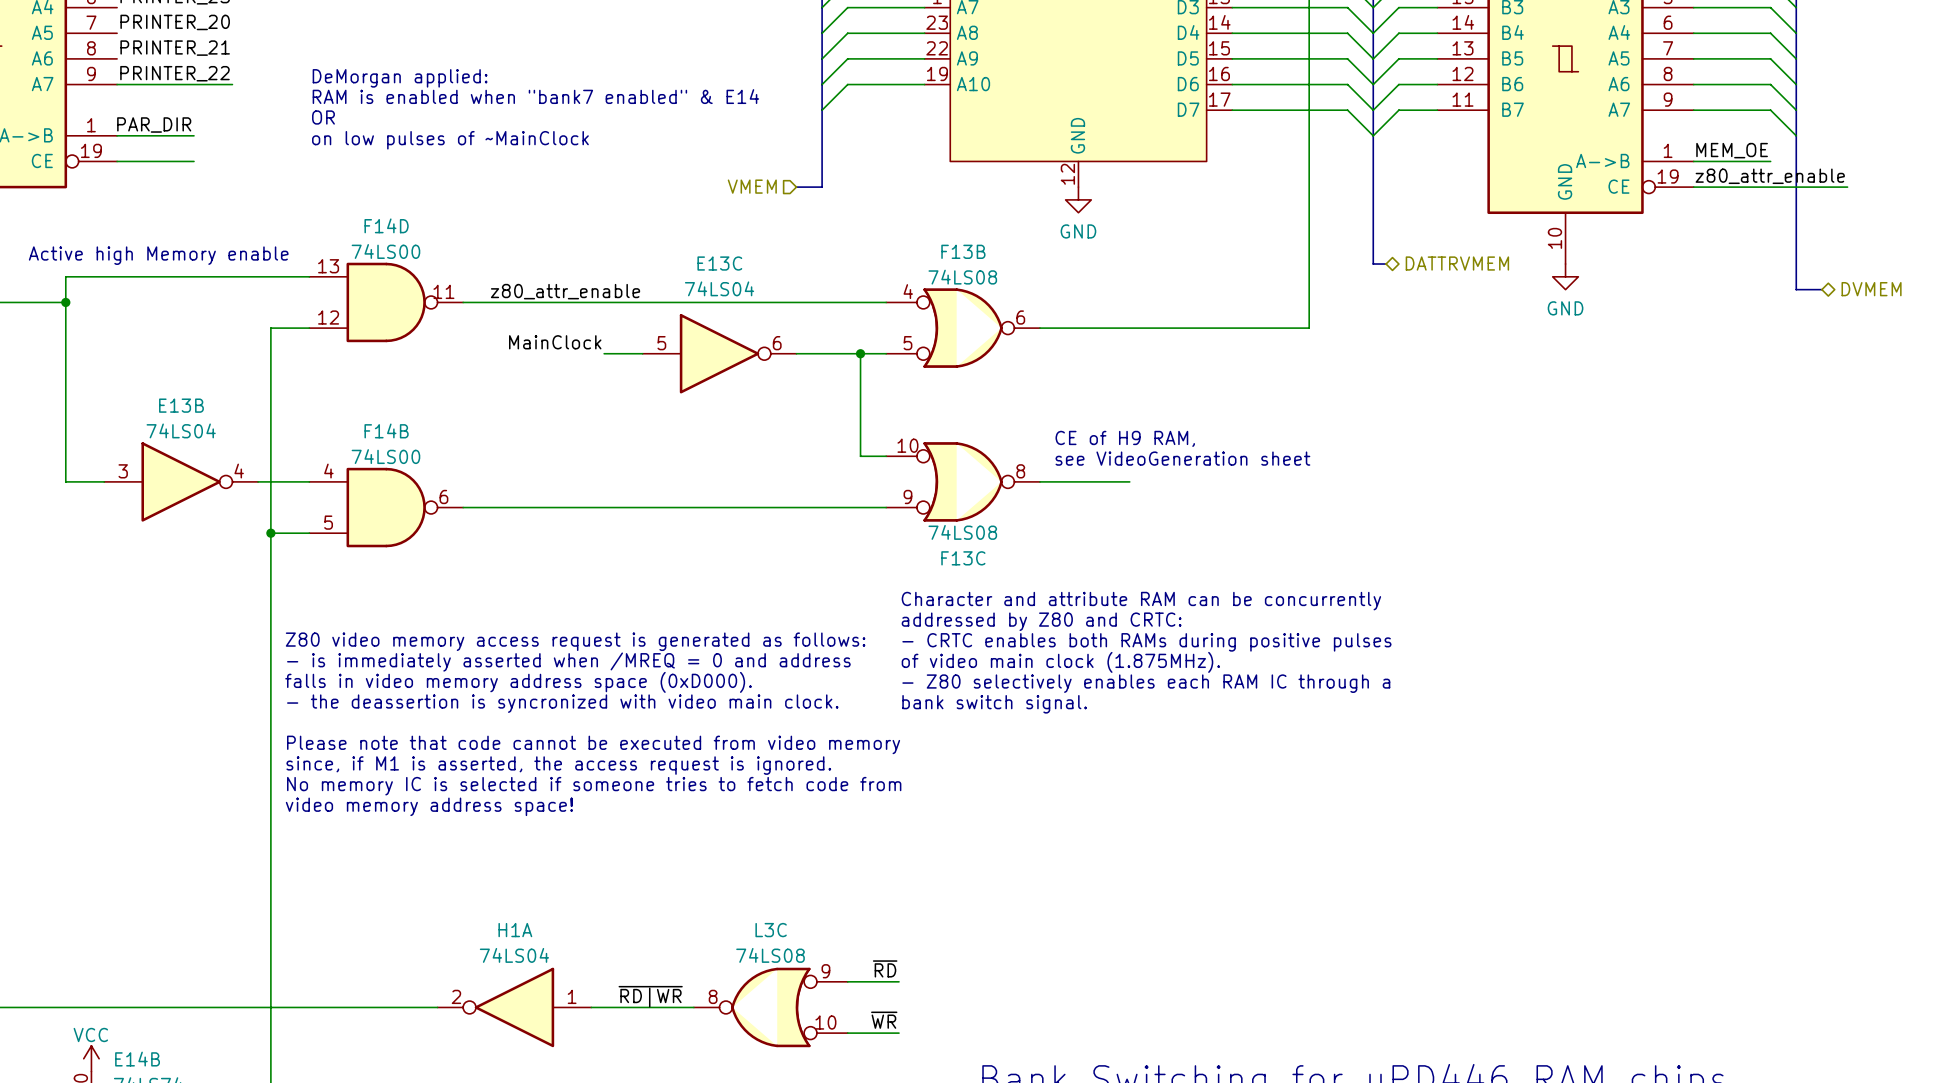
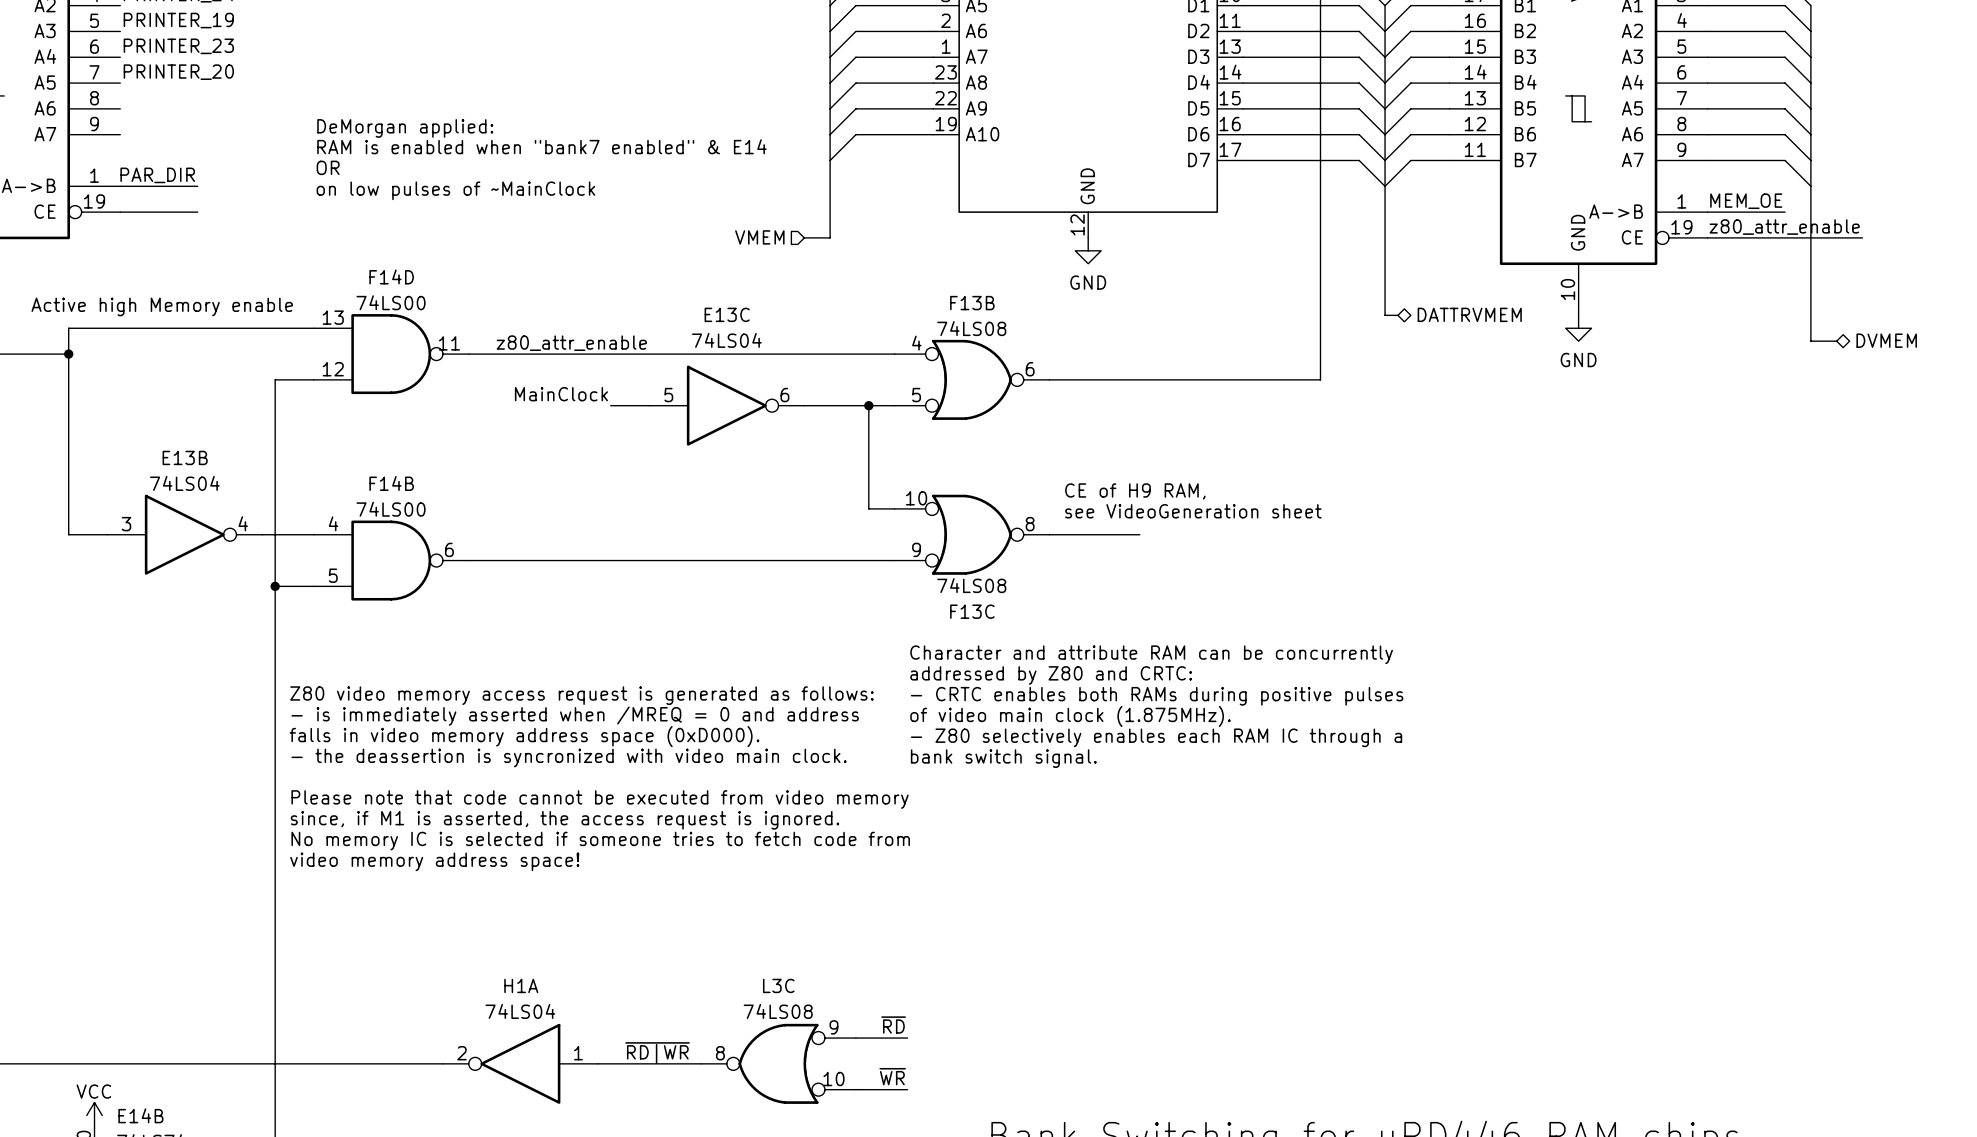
label: PRINTER_21 (175, 48) -> none
label: PRINTER_22 (174, 73) -> none
wire: (117, 84) (232, 84) -> none

